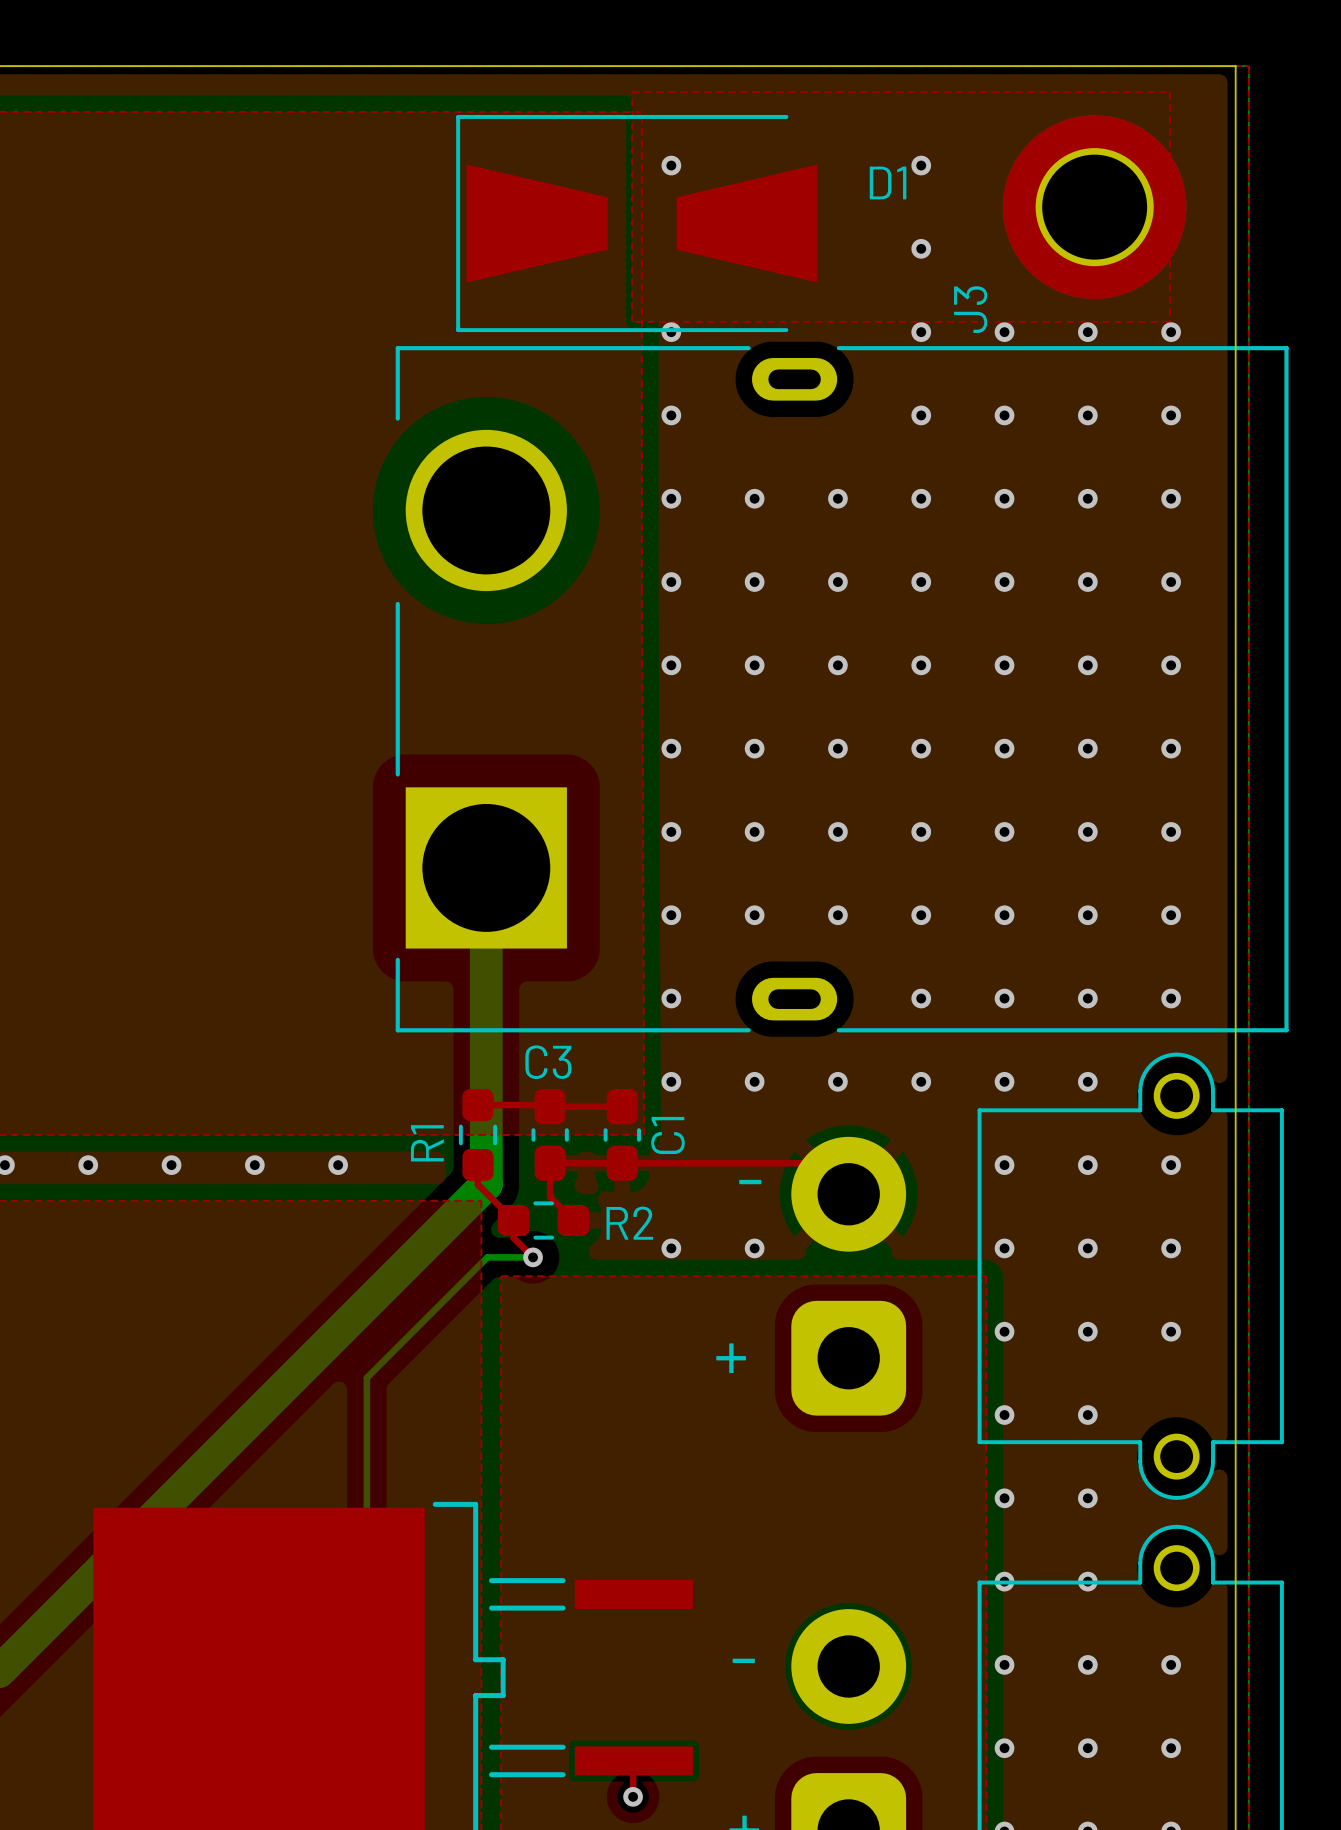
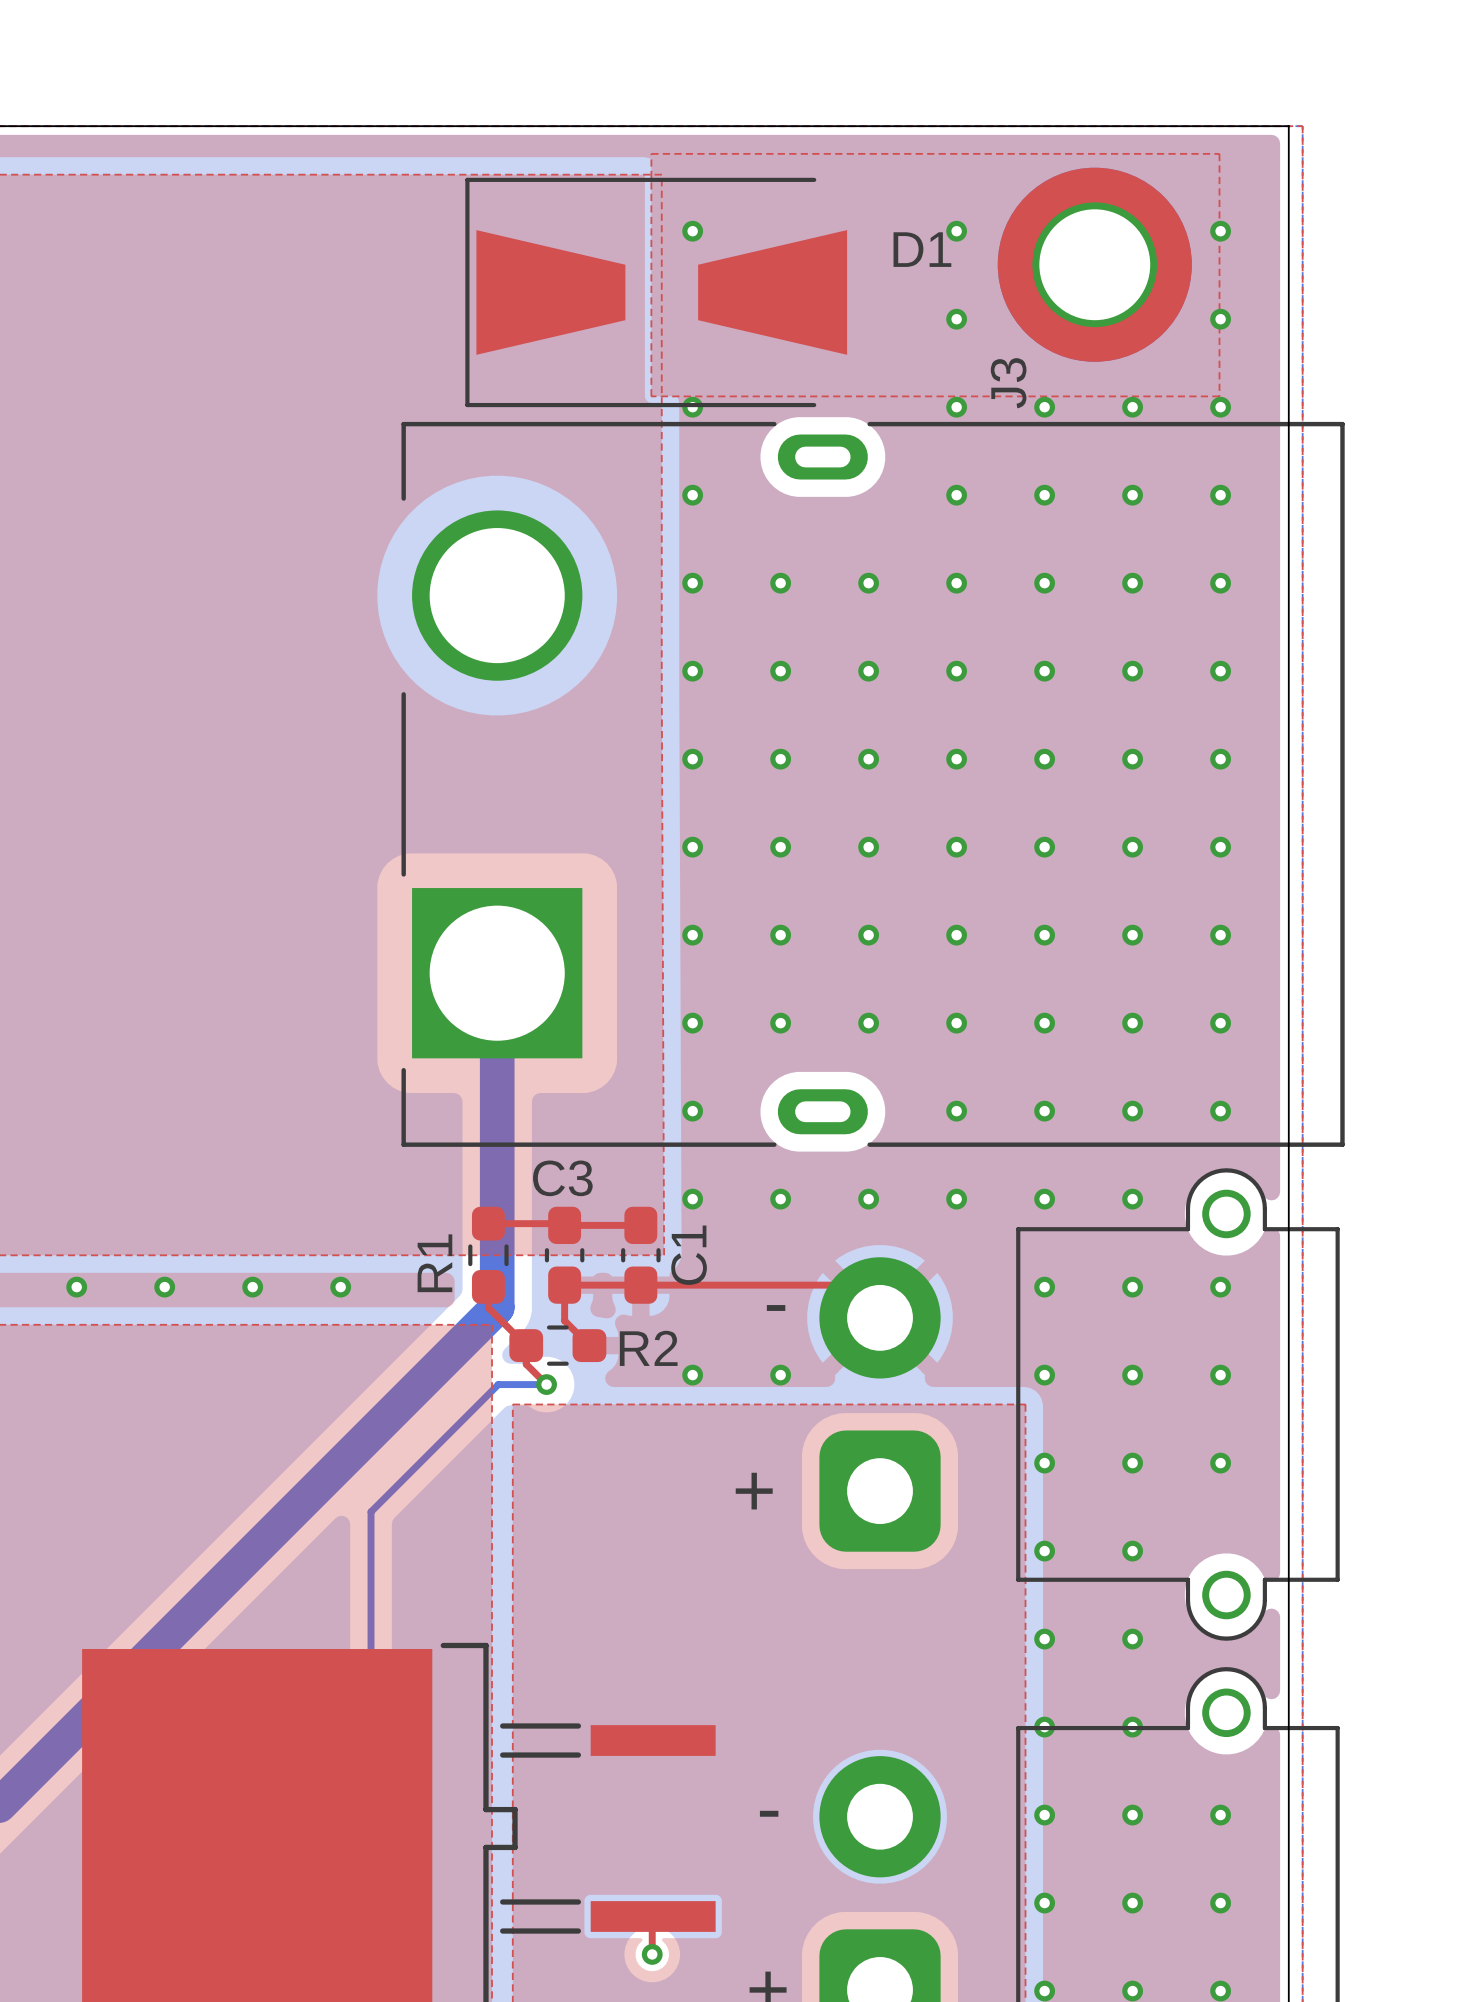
via: none -> (1220, 231)
part position: (1094, 207) -> (1094, 264)
via: none -> (1220, 319)

